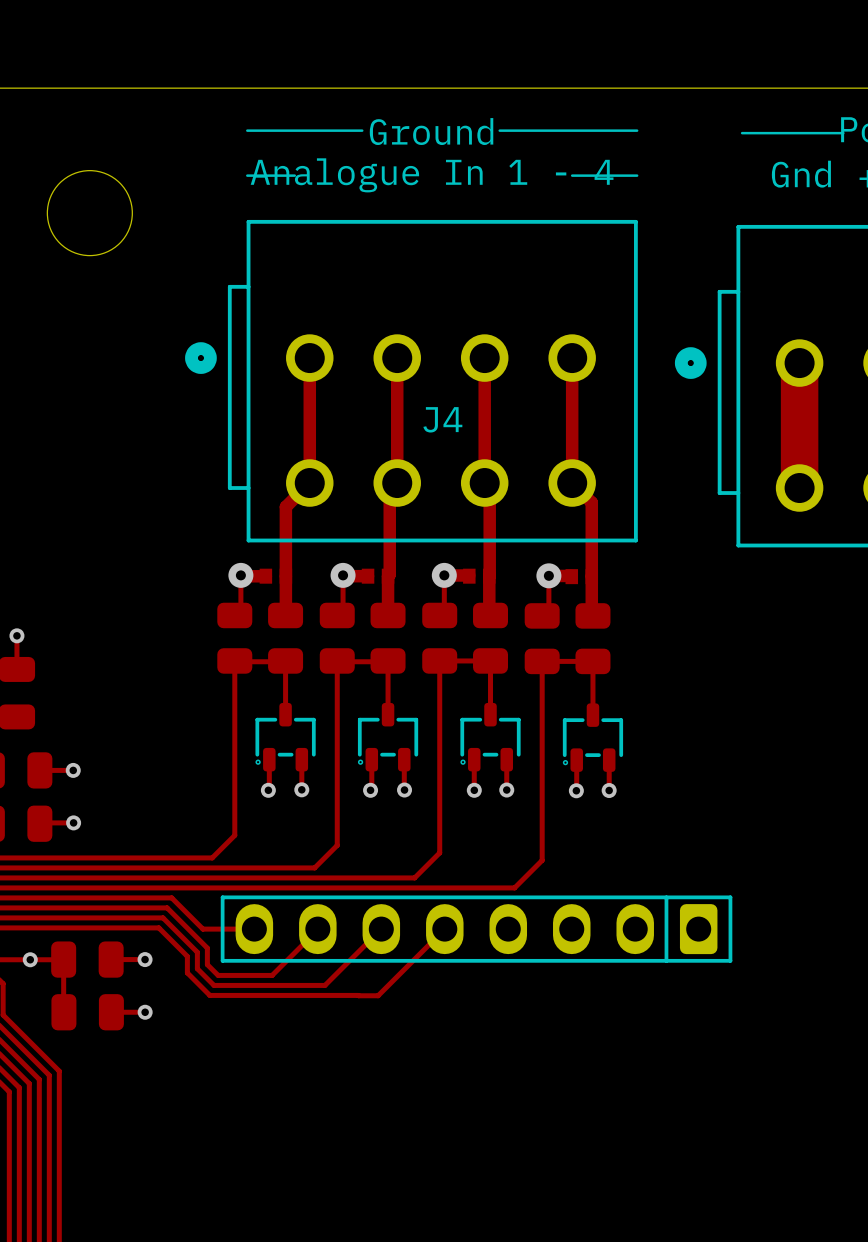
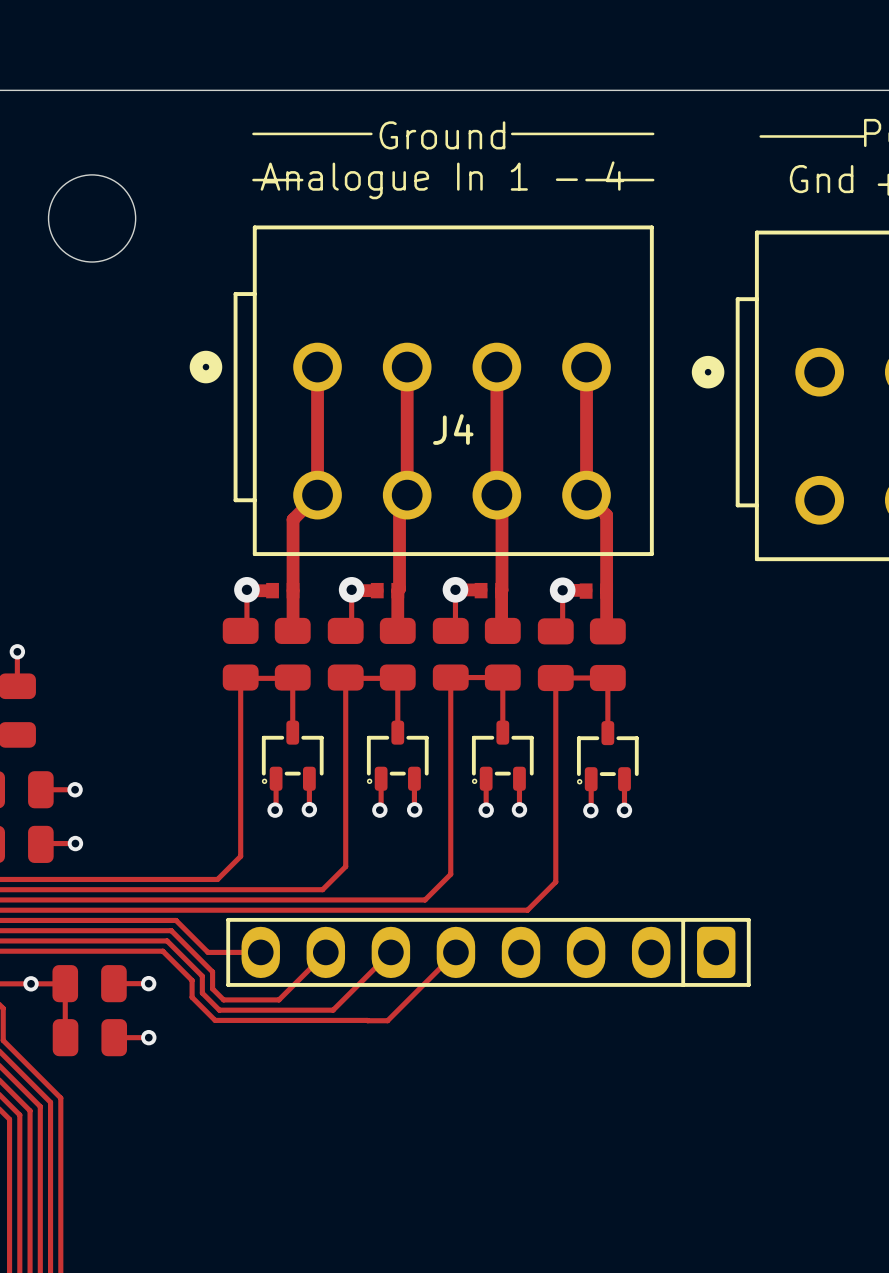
track: (799, 363) (799, 488) -> none

